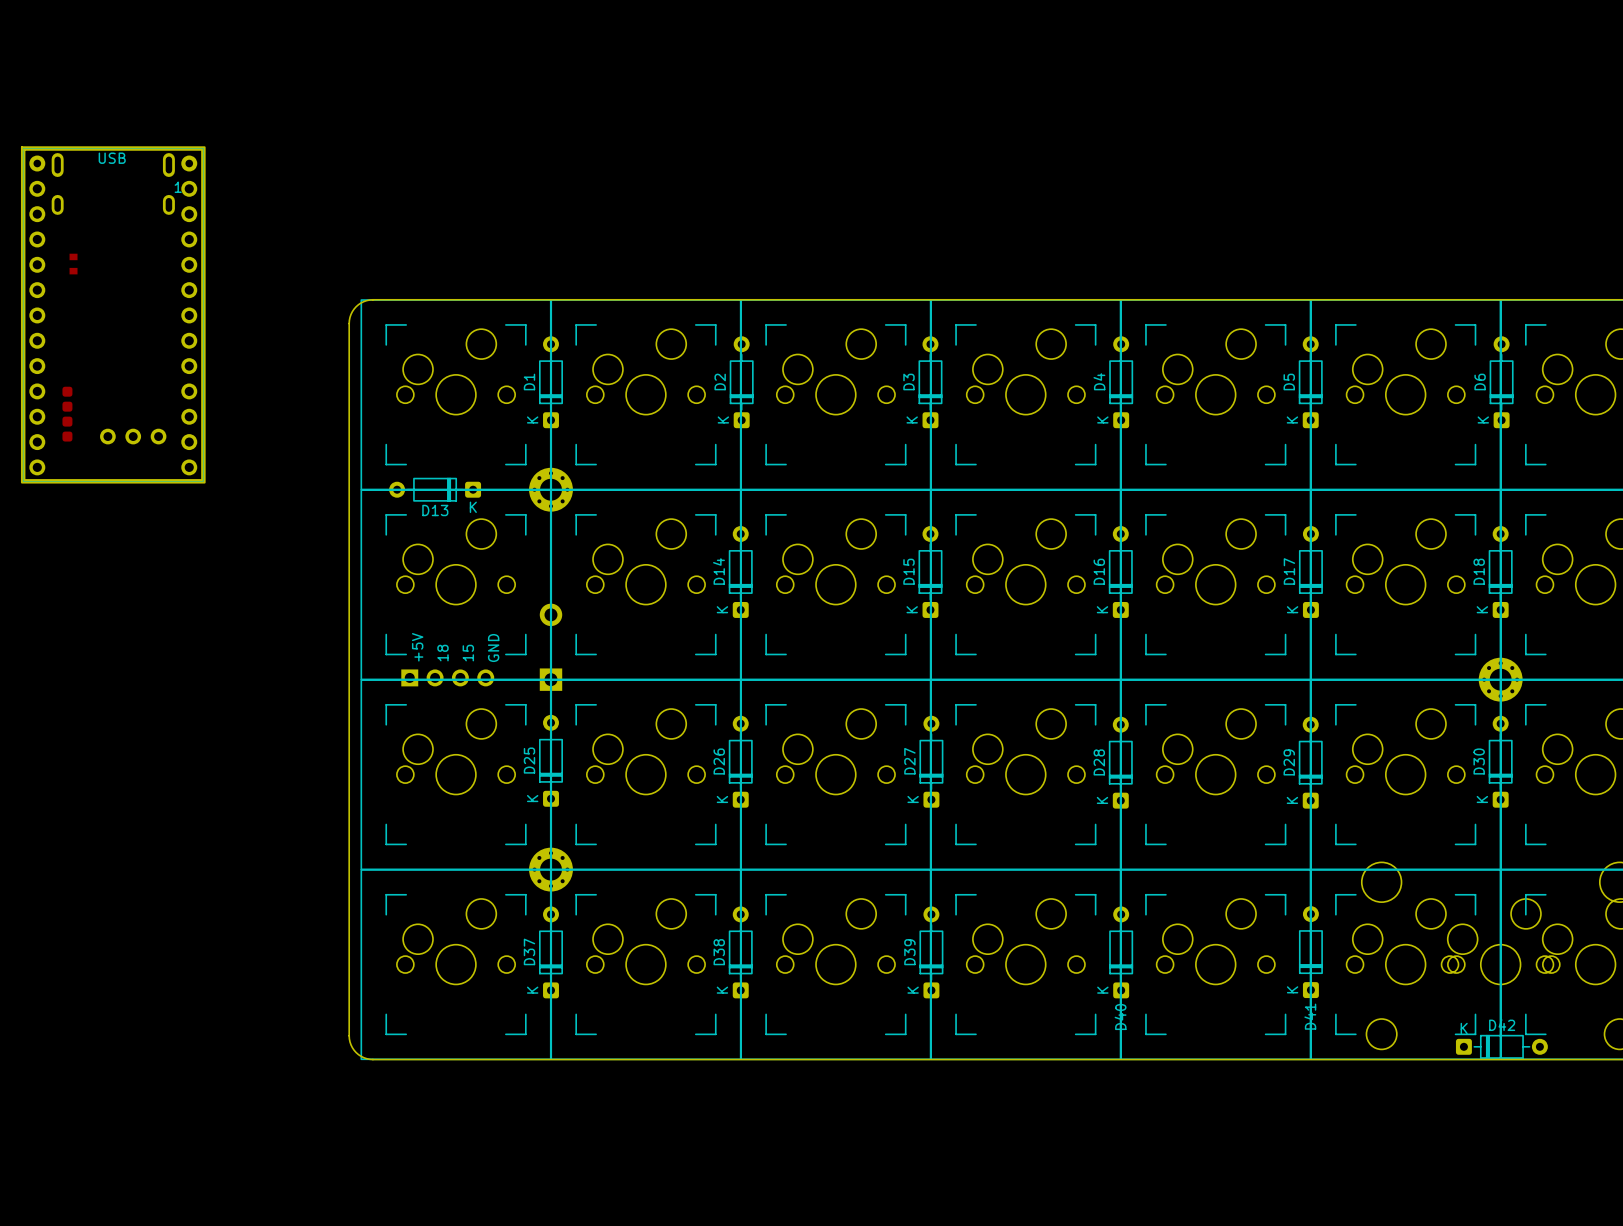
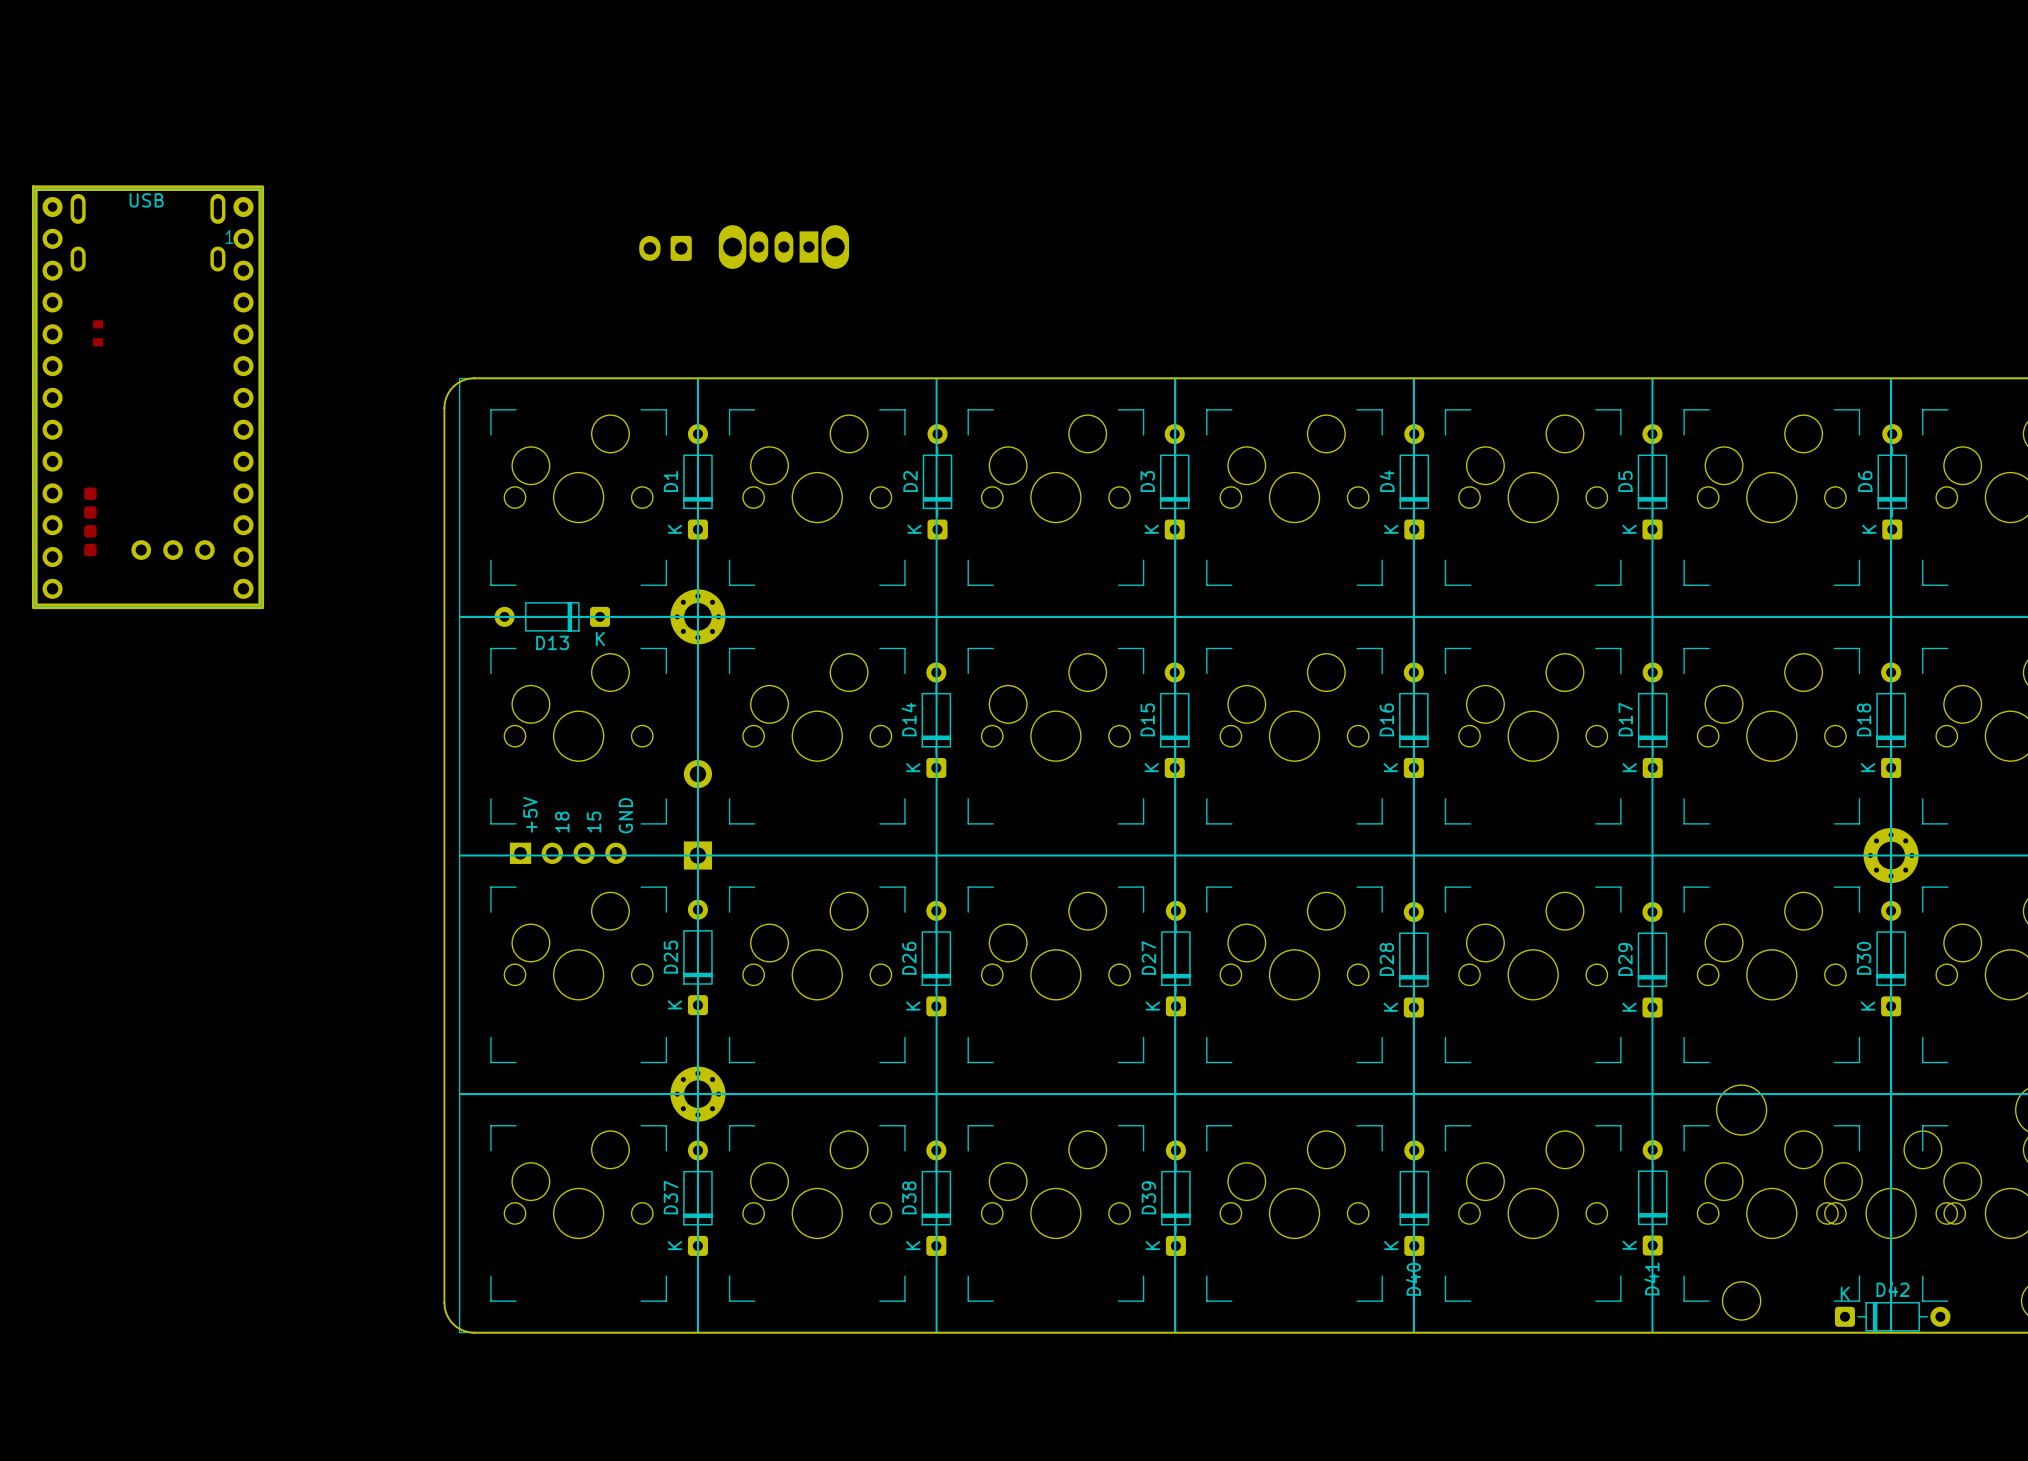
part: none -> (783, 247)
part: none -> (665, 248)

